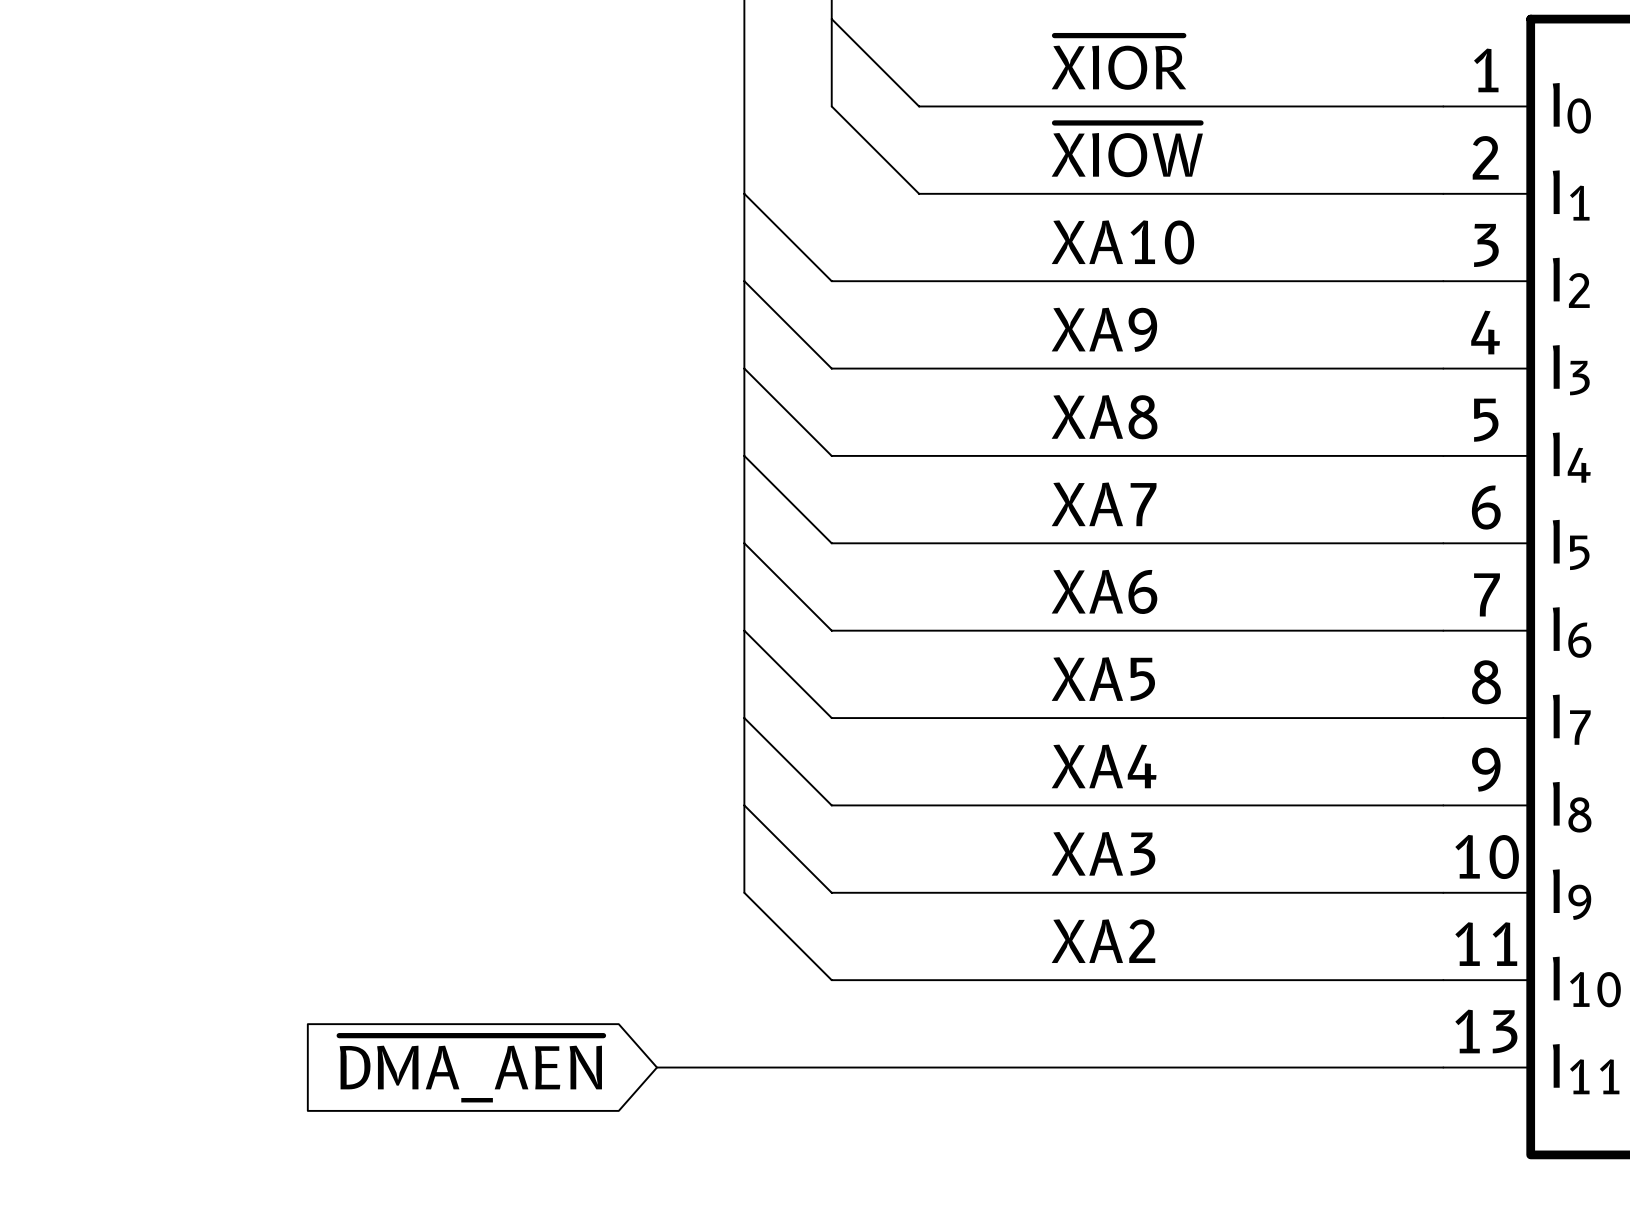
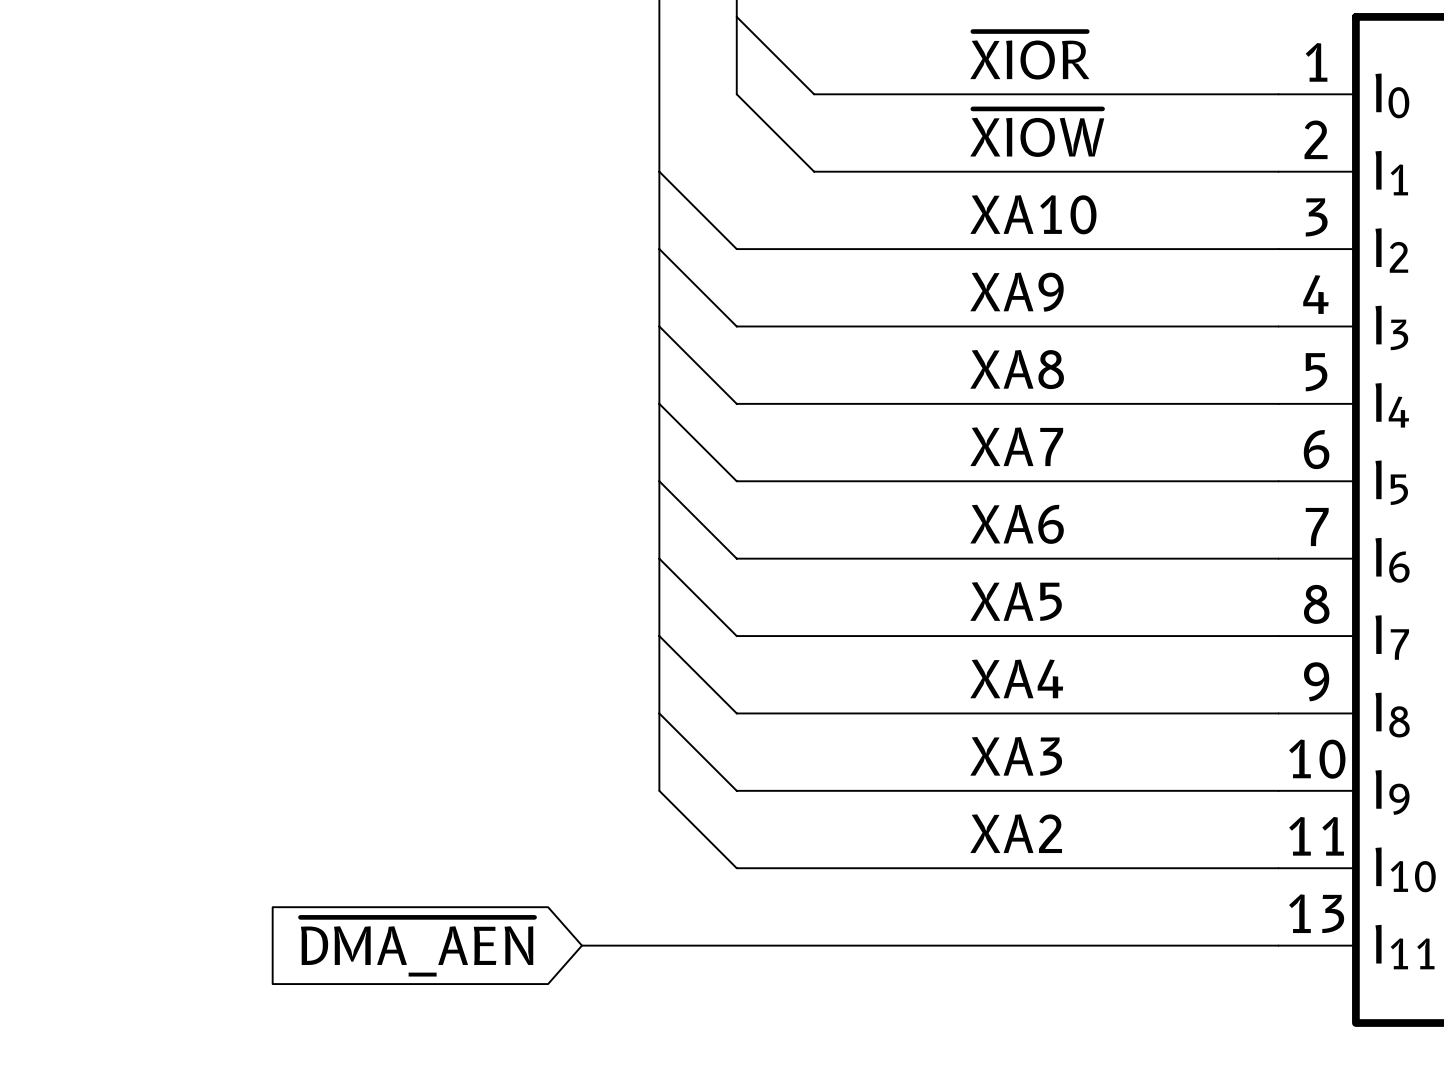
label position: ~{XIOR} (1118, 62) -> ~{XIOR} (1029, 55)
label position: ~{XIOW} (1127, 150) -> ~{XIOW} (1037, 132)
label position: XA10 (1122, 242) -> XA10 (1033, 214)
label position: XA9 (1104, 329) -> XA9 (1016, 292)
label position: XA8 (1104, 417) -> XA8 (1017, 369)
label position: XA7 (1104, 504) -> XA7 (1016, 446)
label position: XA6 (1104, 591) -> XA6 (1017, 524)
label position: XA5 (1103, 679) -> XA5 (1016, 601)
label position: XA4 (1104, 766) -> XA4 (1016, 678)
label position: XA3 (1103, 853) -> XA3 (1016, 756)
label position: XA2 (1103, 941) -> XA2 (1016, 833)

